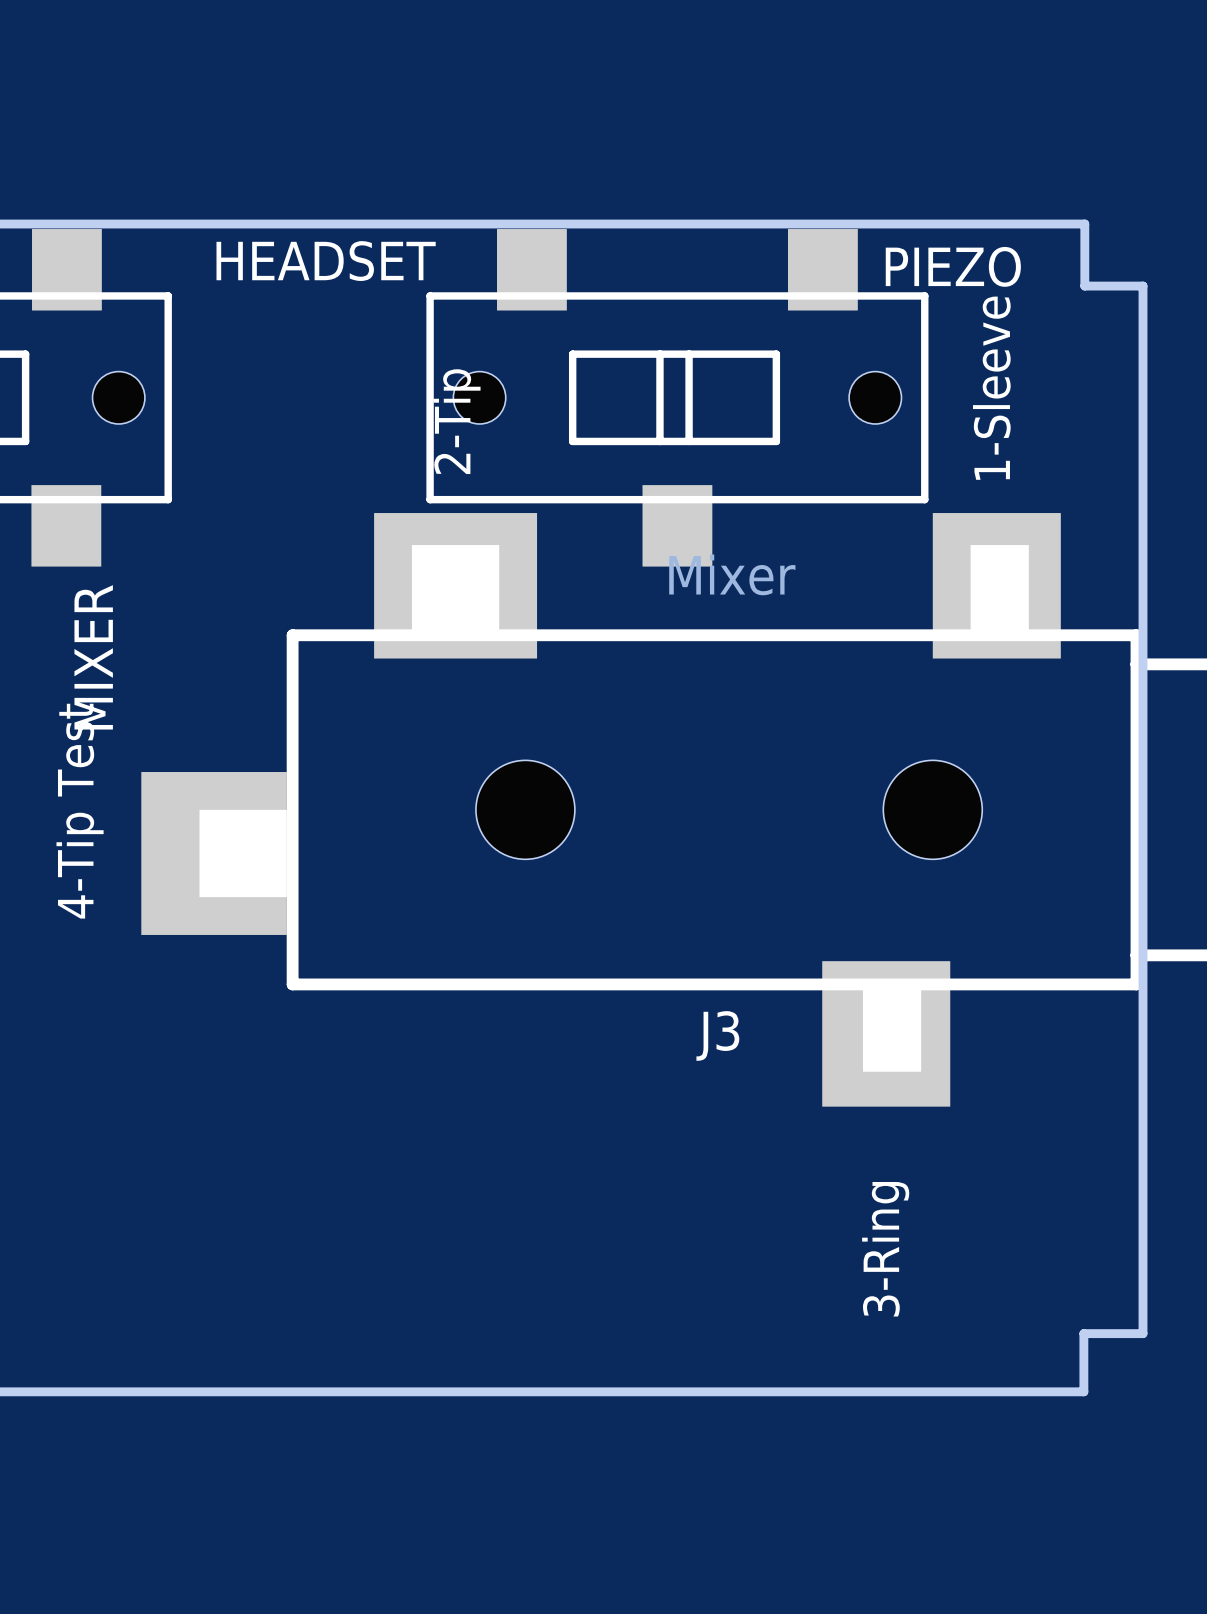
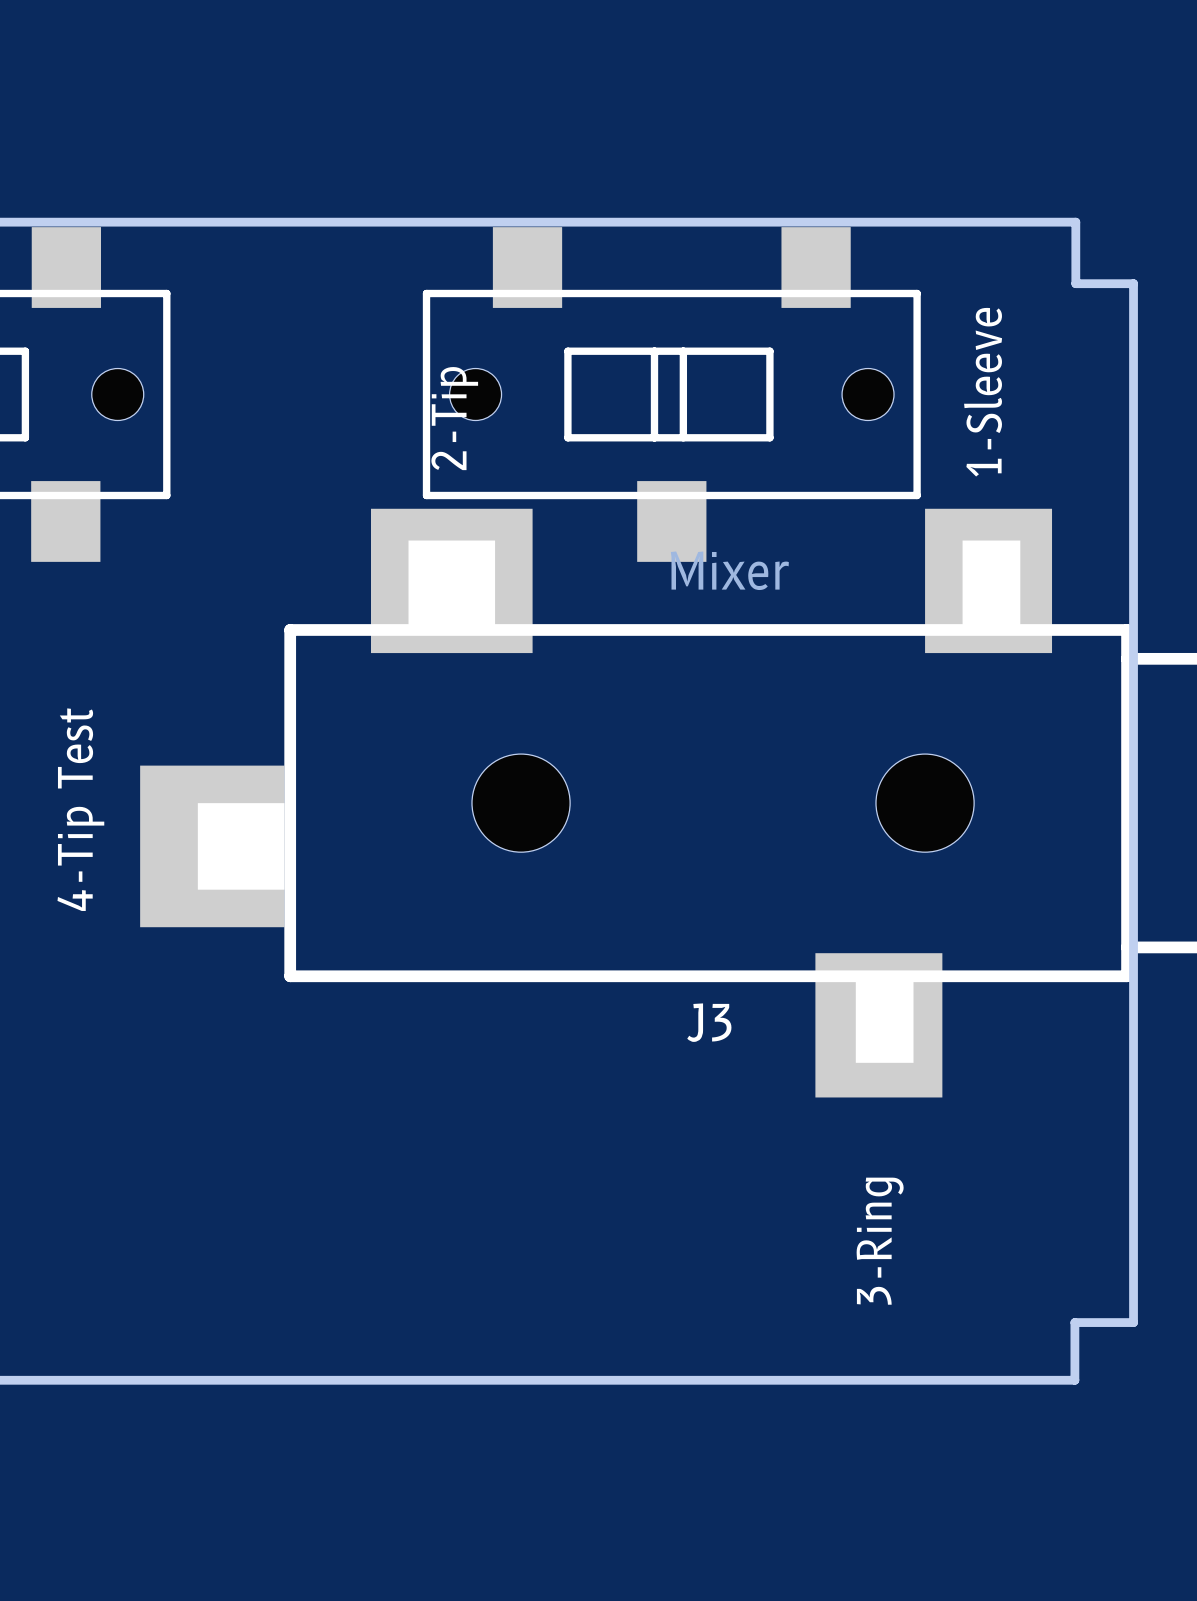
text: HEADSET (326, 261) -> none
text: PIEZO (953, 266) -> none
text: MIXER (93, 657) -> none

